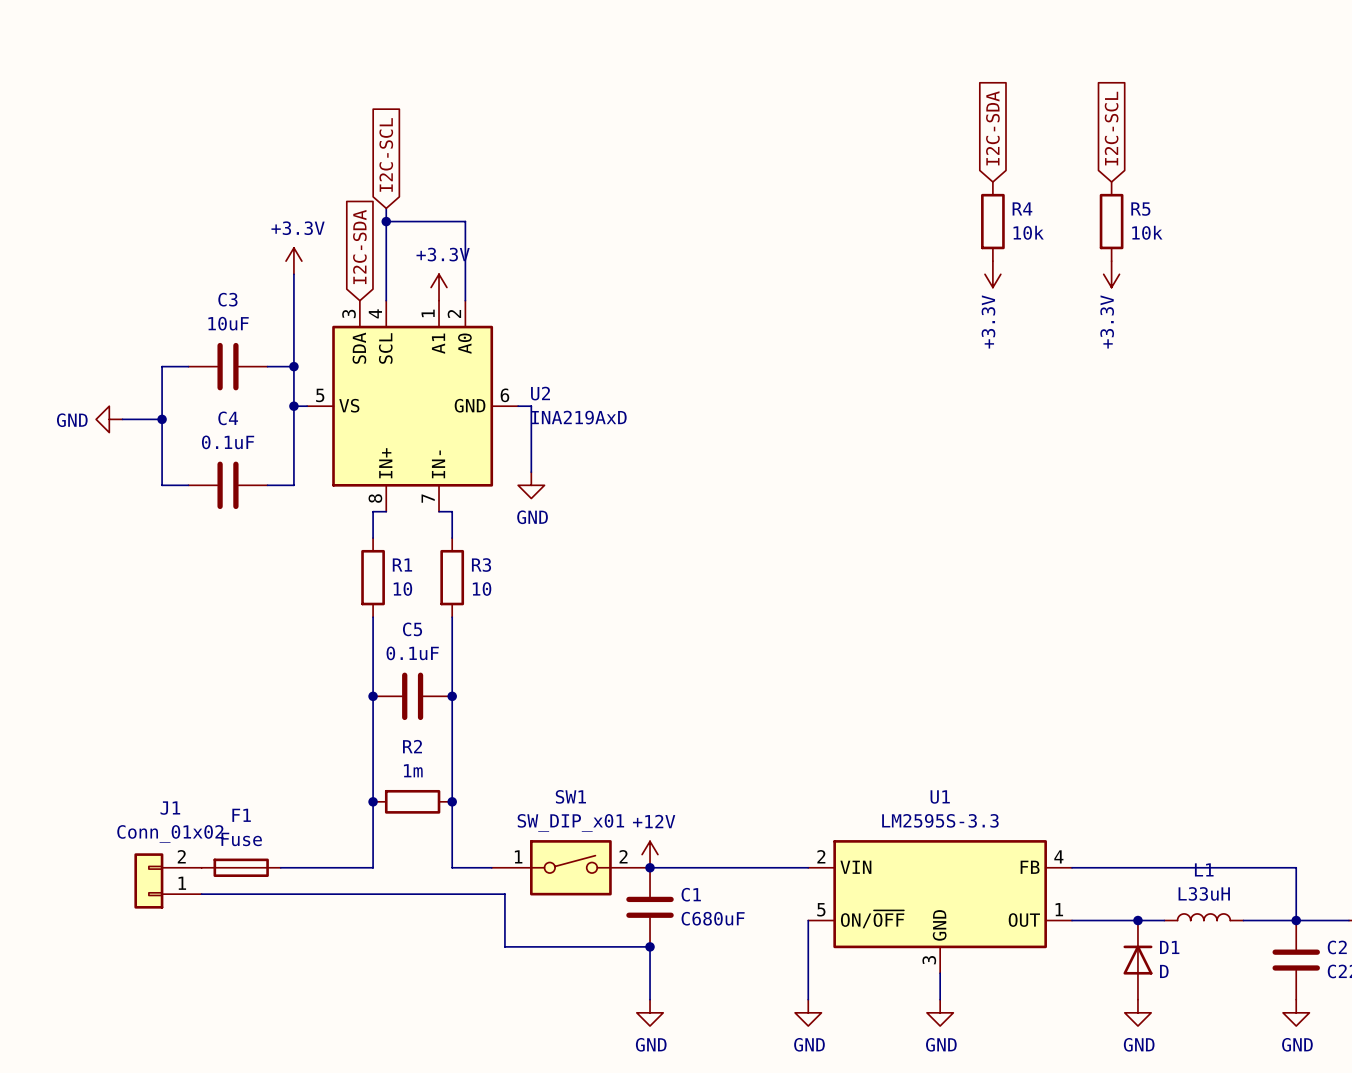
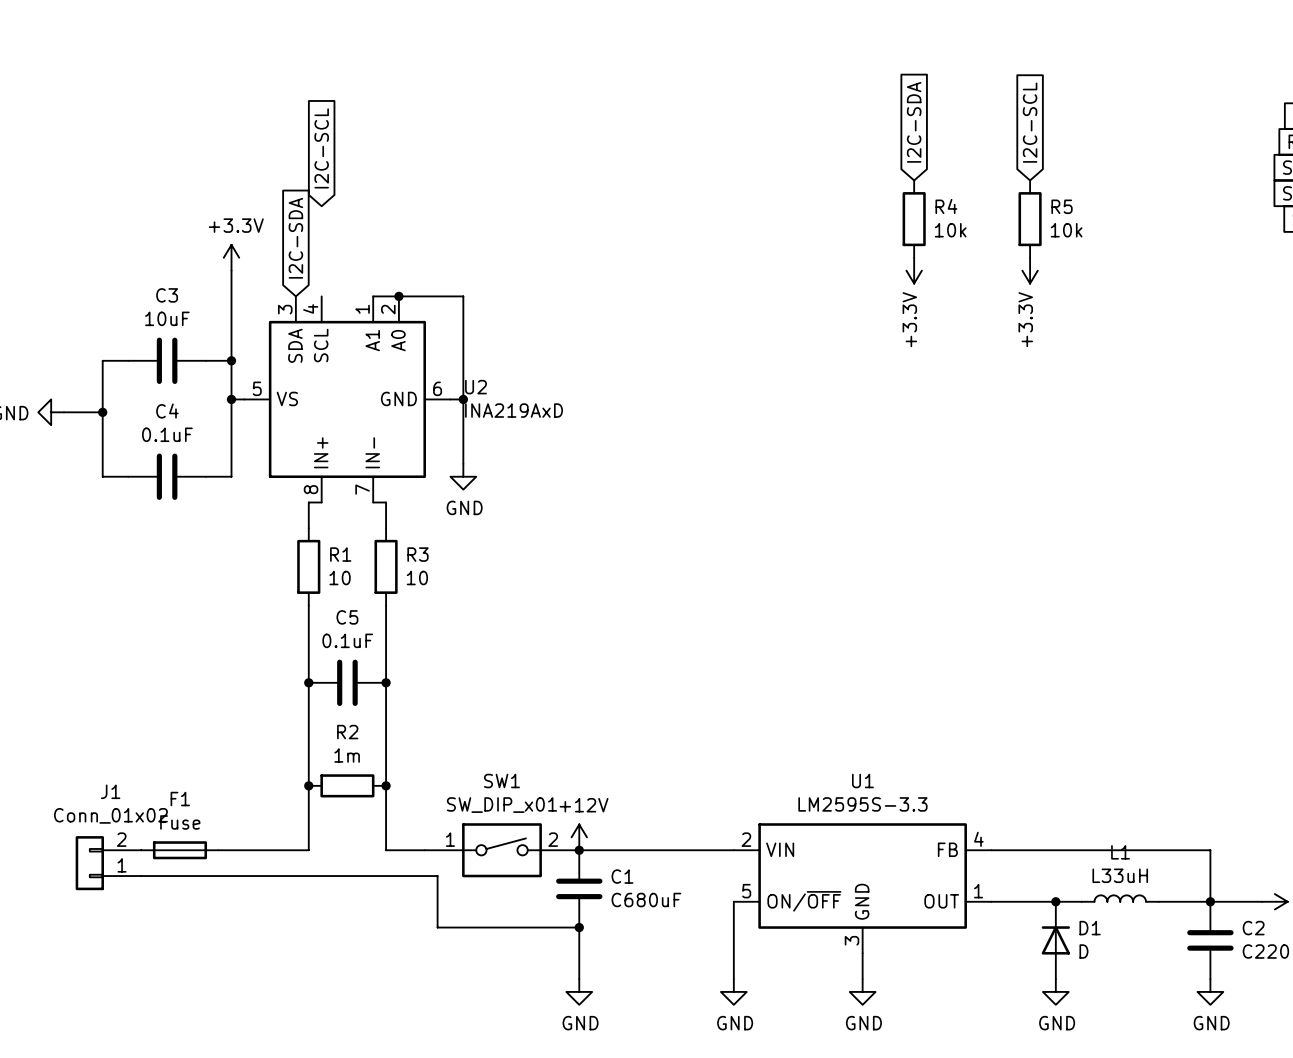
wire: (386, 208) (386, 300) -> none
wire: (386, 221) (465, 221) (465, 300) -> none
junction: (386, 221) -> none
power symbol: +3.3V (439, 287) -> none
wire: none -> (373, 296) (463, 296) (463, 399)
junction: none -> (398, 296)
junction: none -> (463, 399)

